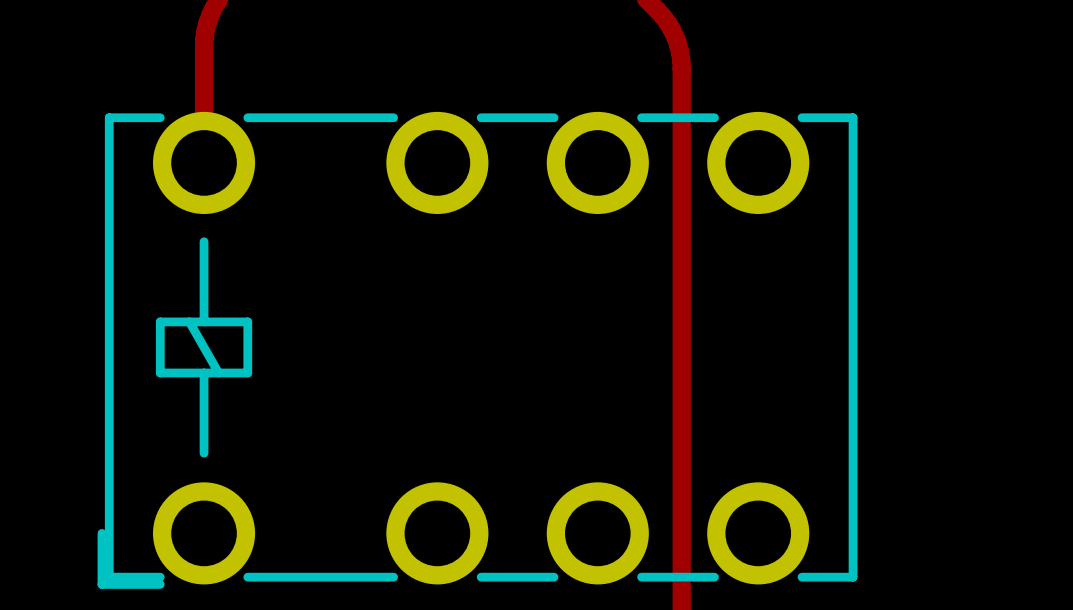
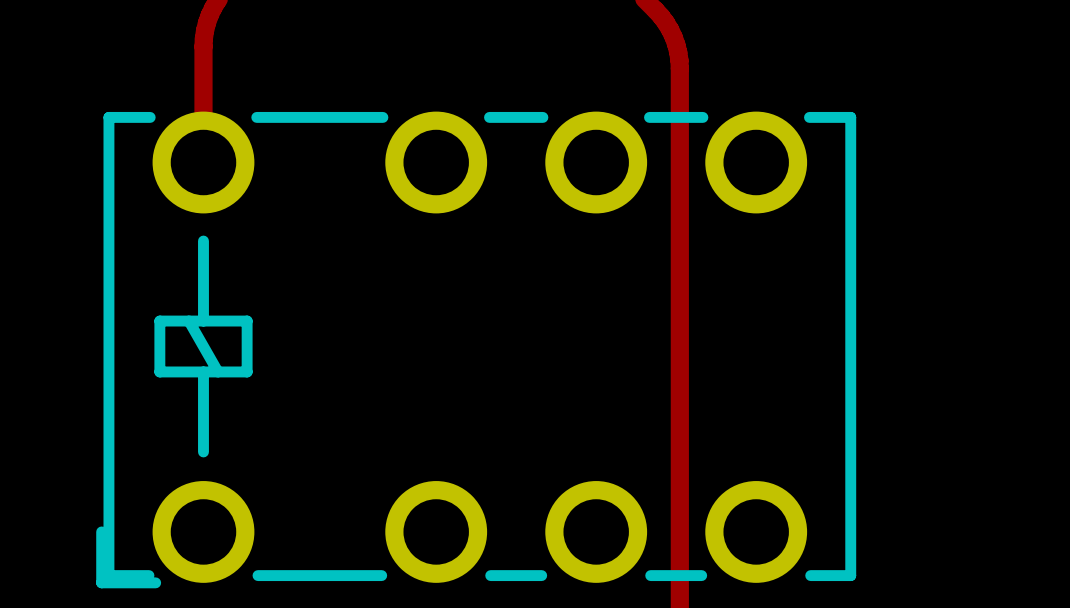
part footprint: [97, 111, 858, 589] -> [96, 111, 857, 589]

